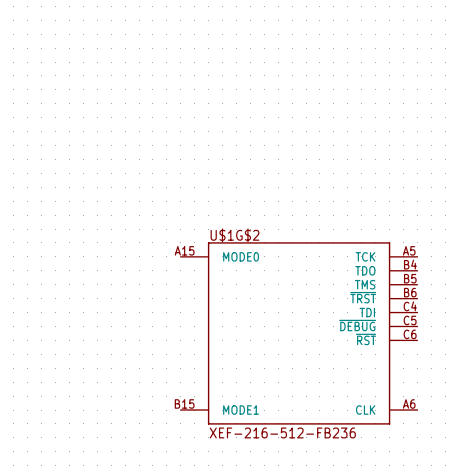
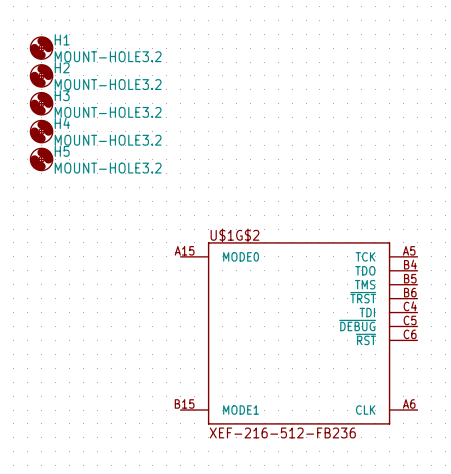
H1: none -> MOUNT-HOLE3.2 (41, 48)
H2: none -> MOUNT-HOLE3.2 (41, 75)
H3: none -> MOUNT-HOLE3.2 (41, 103)
H4: none -> MOUNT-HOLE3.2 (41, 131)
H5: none -> MOUNT-HOLE3.2 (41, 159)

